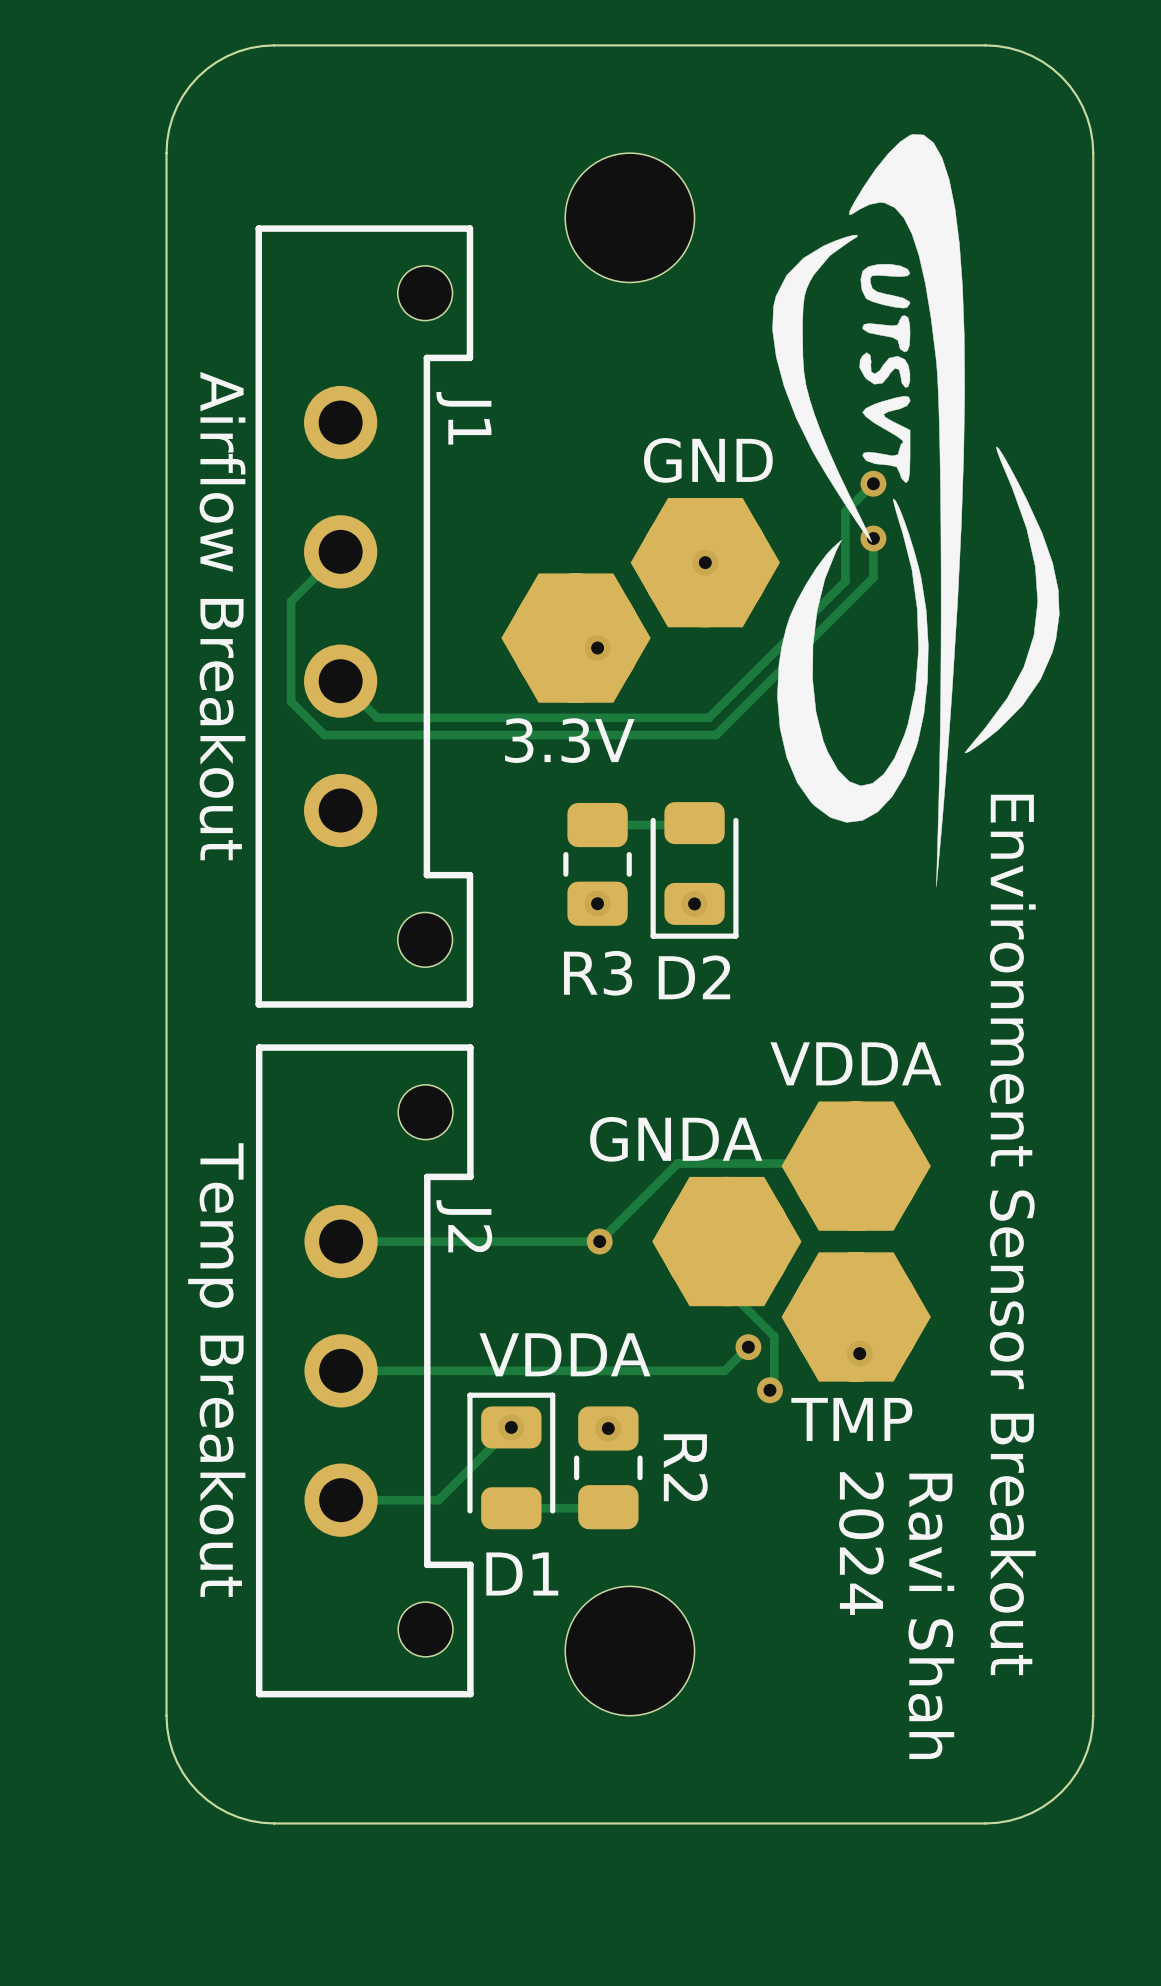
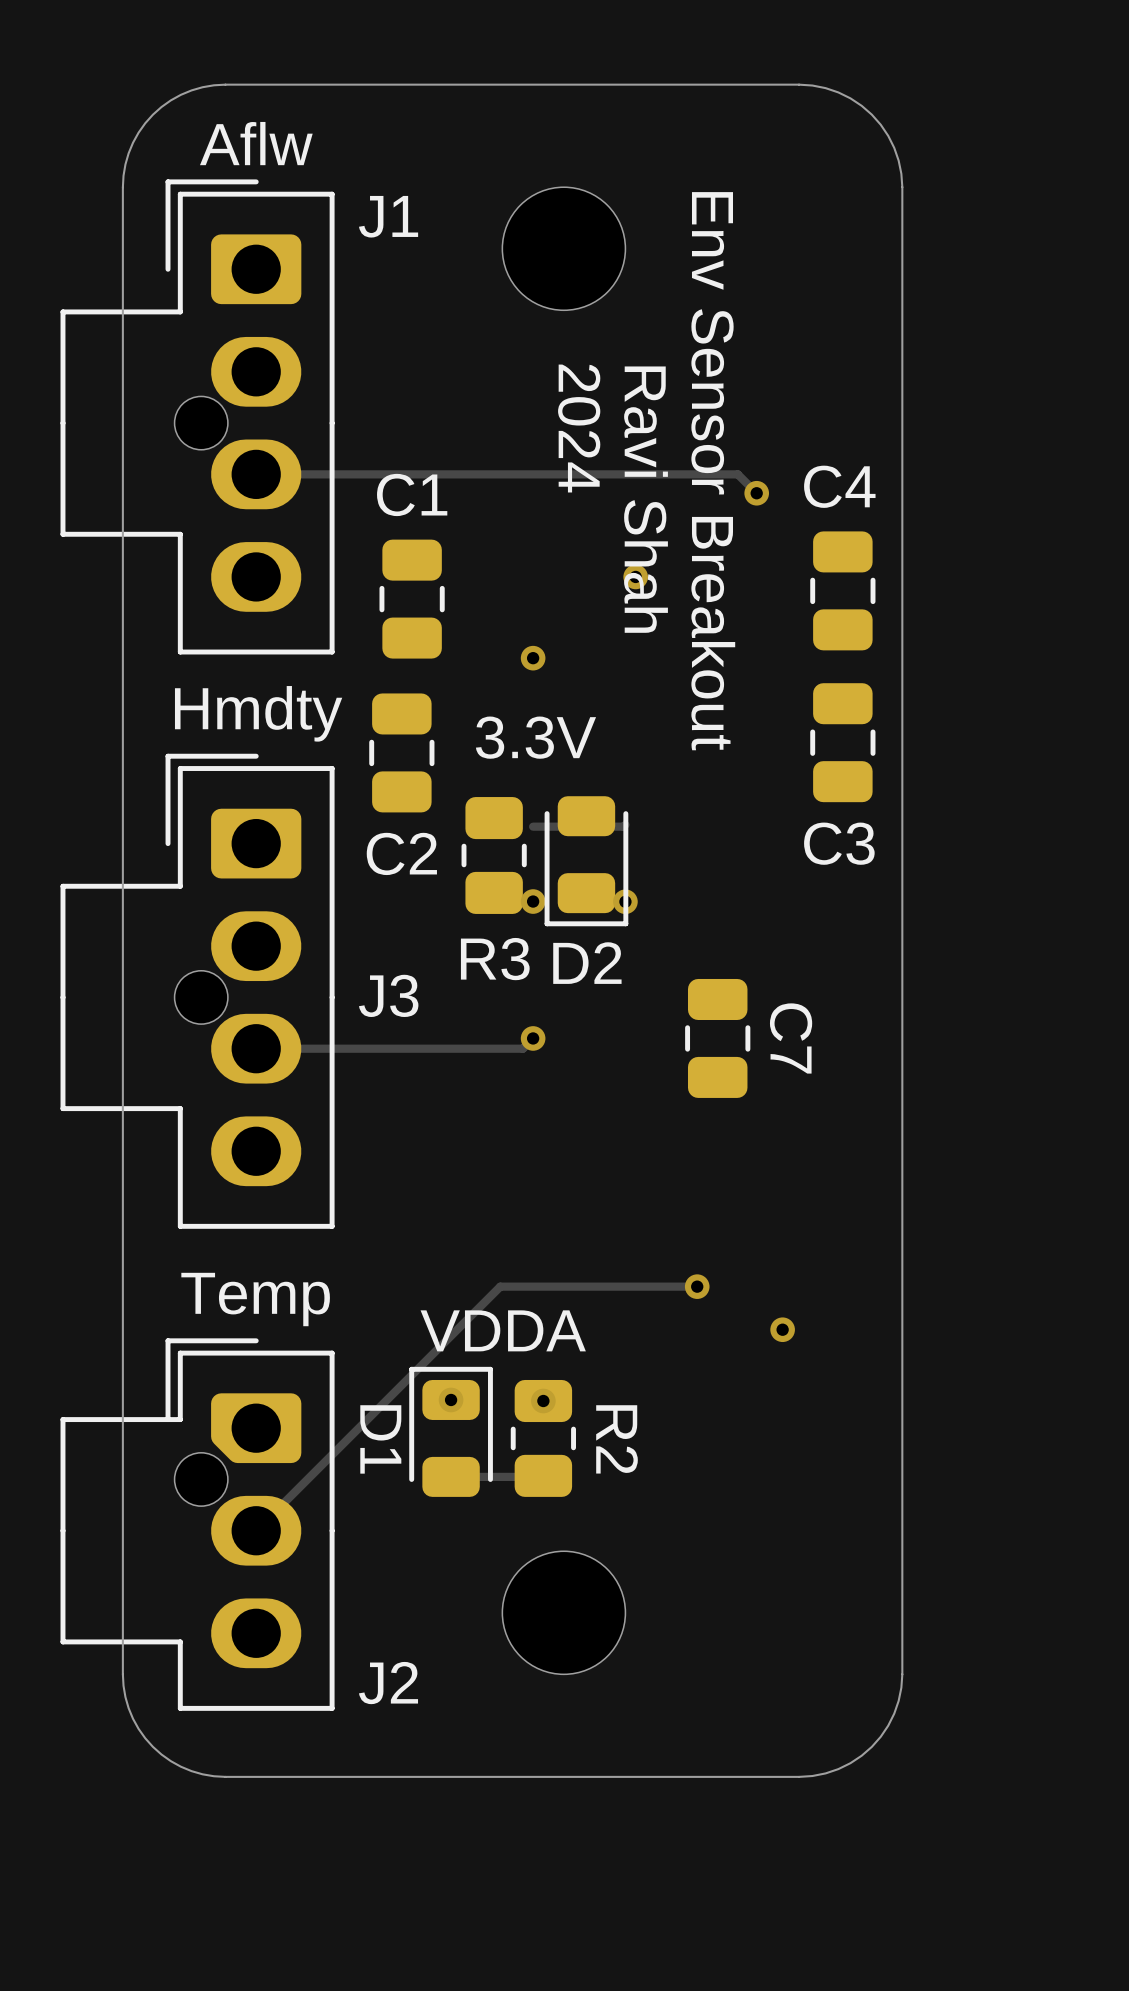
board edge: (876, 45) (997, 46) (1032, 56) (1061, 76) (1076, 95) (1087, 117) (1093, 153) (1092, 1727) (1087, 1751) (1076, 1773) (1052, 1799) (1032, 1812) (997, 1822) (876, 1823) -> (799, 84) (812, 85) (838, 92) (861, 105) (871, 114) (880, 124) (894, 147) (901, 173) (902, 187) (902, 1674) (898, 1700) (894, 1713) (888, 1725) (871, 1746) (861, 1755) (838, 1769) (825, 1773) (799, 1776)
text: none -> Aflw (256, 143)
drawing: [772, 134, 1060, 887] -> none
J1 footprint: [255, 225, 474, 1008] -> [60, 179, 335, 655]
text: none -> 2024 (579, 428)
J1 name position: J1 (463, 418) -> J1 (388, 216)
track: none -> (256, 474) (737, 474) (756, 493)
text: GND (708, 460) -> none
text: none -> Env Sensor Breakout (713, 471)
via: none -> (756, 493)
track: (873, 483) (845, 511) (845, 581) (708, 717) (377, 717) (340, 681) -> none
via: (873, 483) -> none
text: none -> Ravi Shah (646, 499)
track: (873, 538) (873, 577) (716, 735) (324, 735) (291, 701) (291, 601) (340, 551) -> none
via: (873, 538) -> none
part: (705, 562) -> none
C4: none -> (842, 590)
C1: none -> (412, 599)
text: Airflow Breakout (222, 616) -> none
part: (576, 638) -> none
text: none -> Hmdty (258, 713)
C3: none -> (842, 742)
text position: 3.3V (569, 740) -> 3.3V (535, 737)
C2: none -> (401, 752)
R3 position: (597, 864) -> (494, 855)
D2 position: (694, 870) -> (586, 861)
J3: none -> (197, 991)
J2 footprint: [255, 1044, 474, 1698] -> [60, 1338, 335, 1711]
track: none -> (533, 1038) (522, 1048) (256, 1048)
via: none -> (533, 1038)
C7: none -> (717, 1038)
text: VDDA (855, 1063) -> none
text: GNDA (676, 1139) -> none
track: (856, 1166) (853, 1163) (677, 1163) (599, 1241) (341, 1241) -> none
part: (856, 1166) -> none
J2 name position: J2 (464, 1226) -> J2 (388, 1683)
text: Environment Sensor Breakout (1012, 1234) -> none
via: (599, 1241) -> none
track: (726, 1241) (726, 1289) (774, 1336) (774, 1385) (769, 1390) -> none
part: (726, 1241) -> none
track: none -> (697, 1286) (500, 1286) (256, 1530)
via: none -> (697, 1286)
part: (856, 1316) -> none
text: none -> Temp (255, 1299)
track: (748, 1347) (724, 1370) (341, 1370) -> none
via: (748, 1347) -> none
text: Temp Breakout (216, 1370) -> none
via: (769, 1390) -> none
text: TMP (851, 1419) -> none
track: (511, 1427) (438, 1500) (341, 1500) -> none
text: 2024 (861, 1543) -> none
D1 name rotation: 0° (522, 1573) -> 90° clockwise (380, 1439)
D1 name position: D1 (522, 1573) -> D1 (380, 1439)
text: Ravi Shah (931, 1616) -> none

